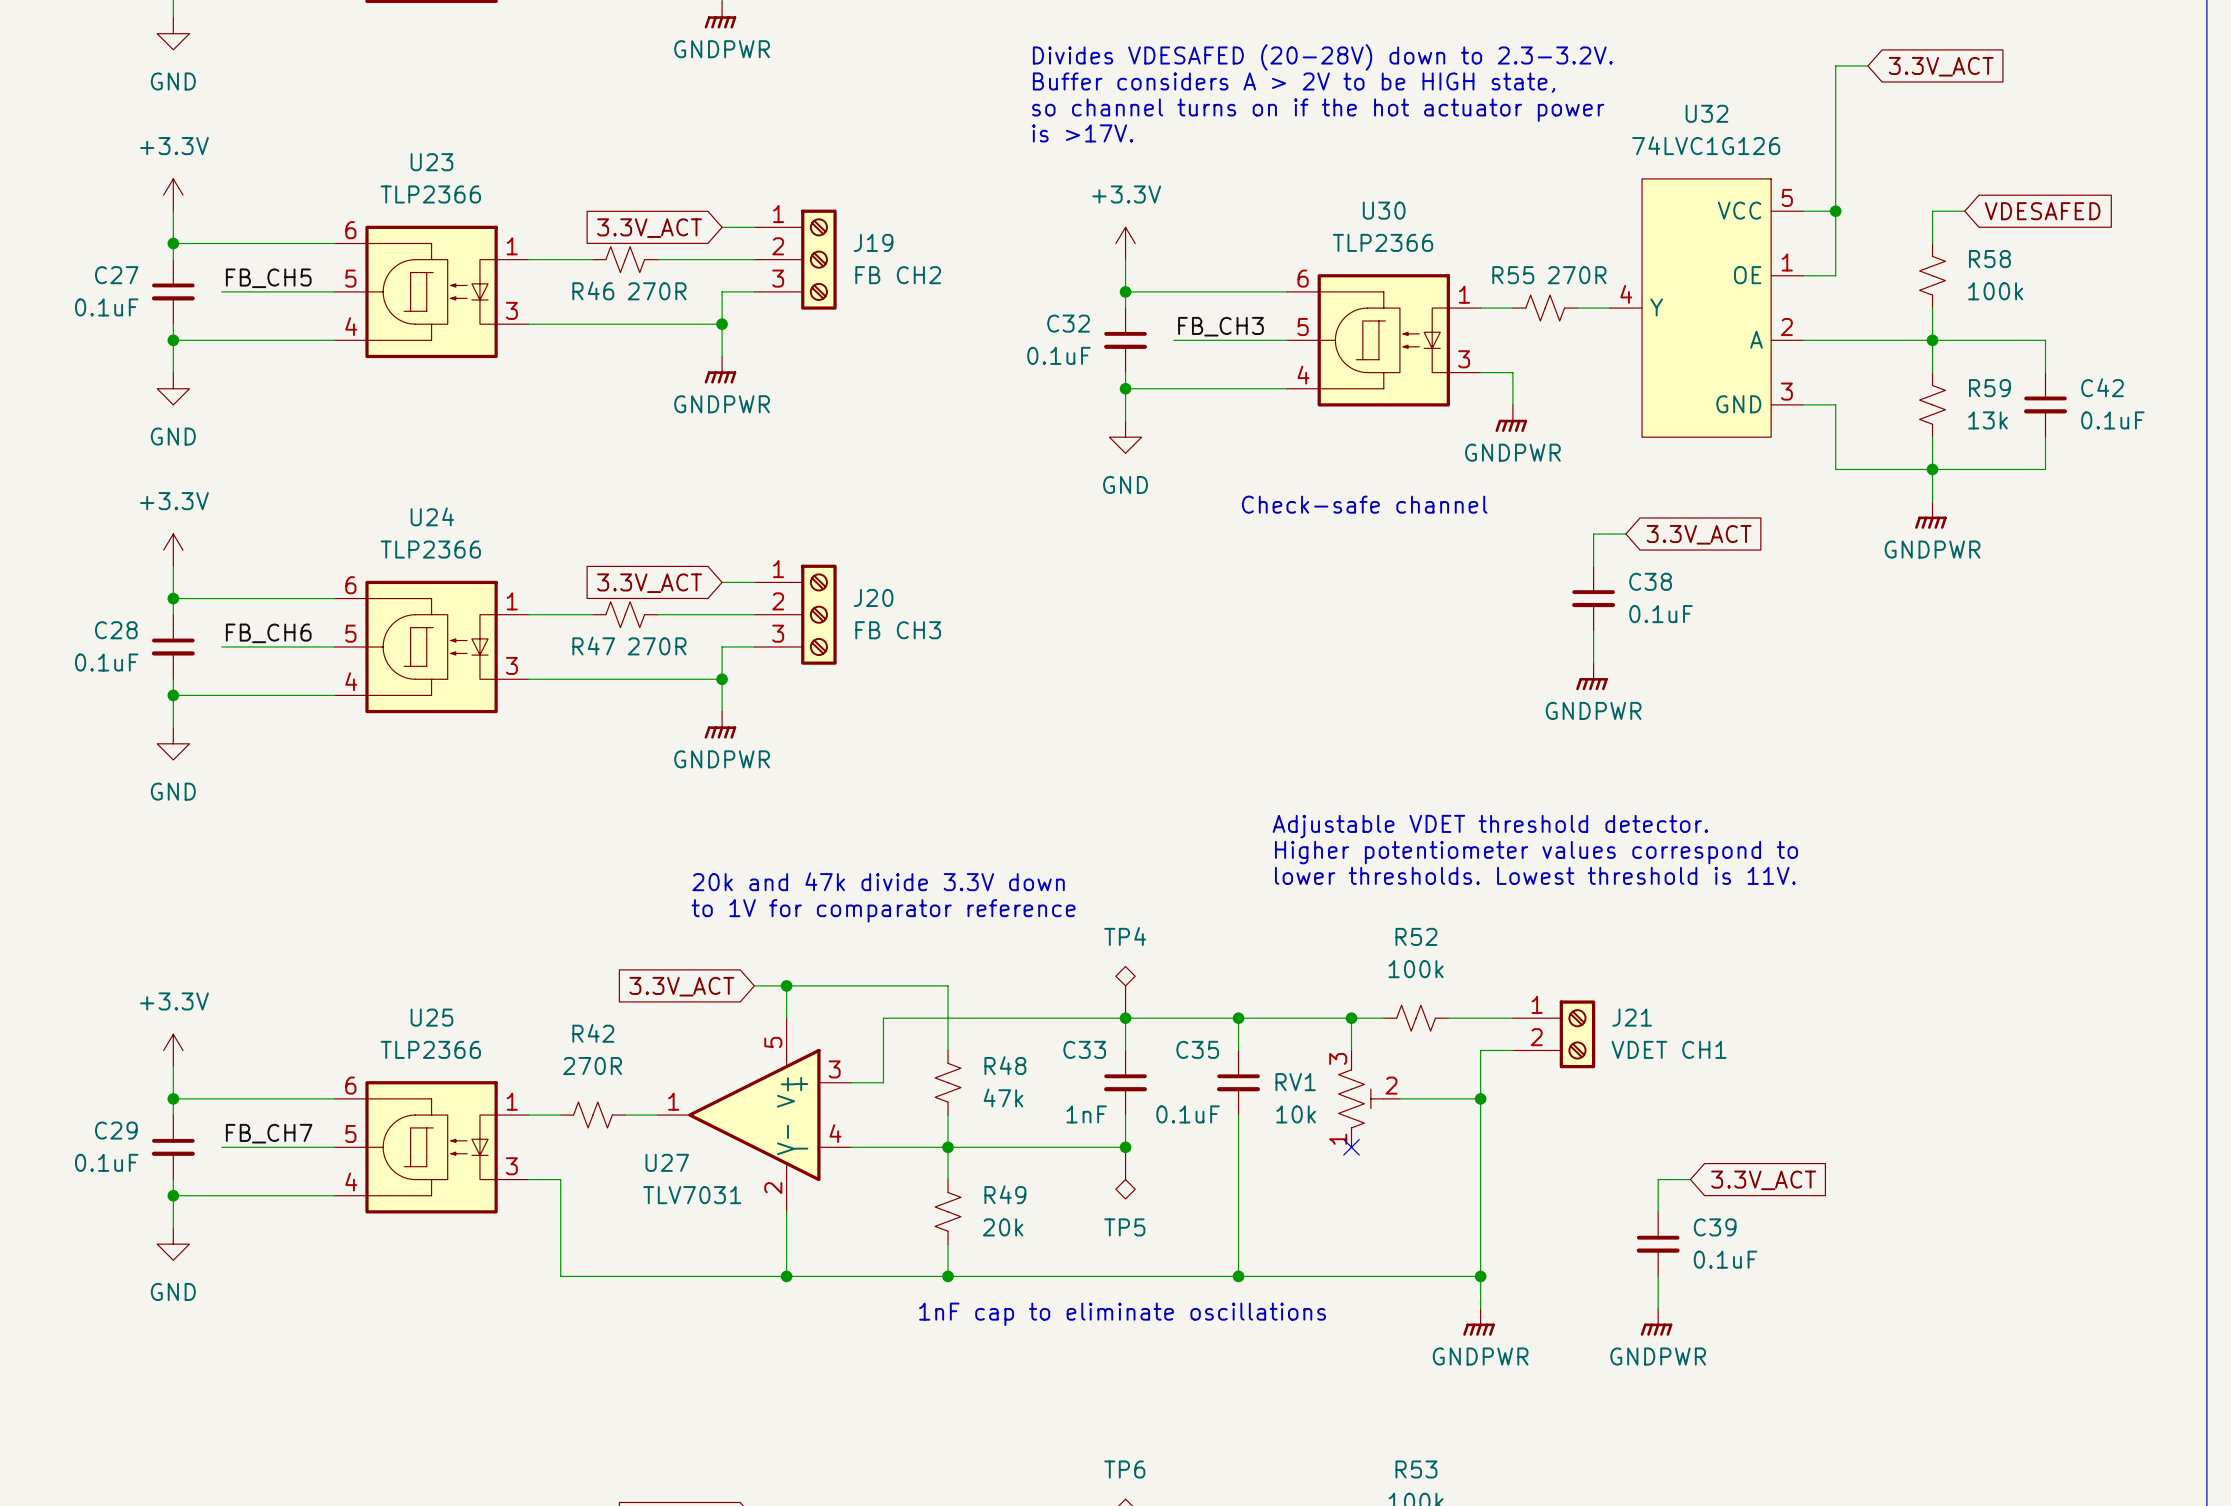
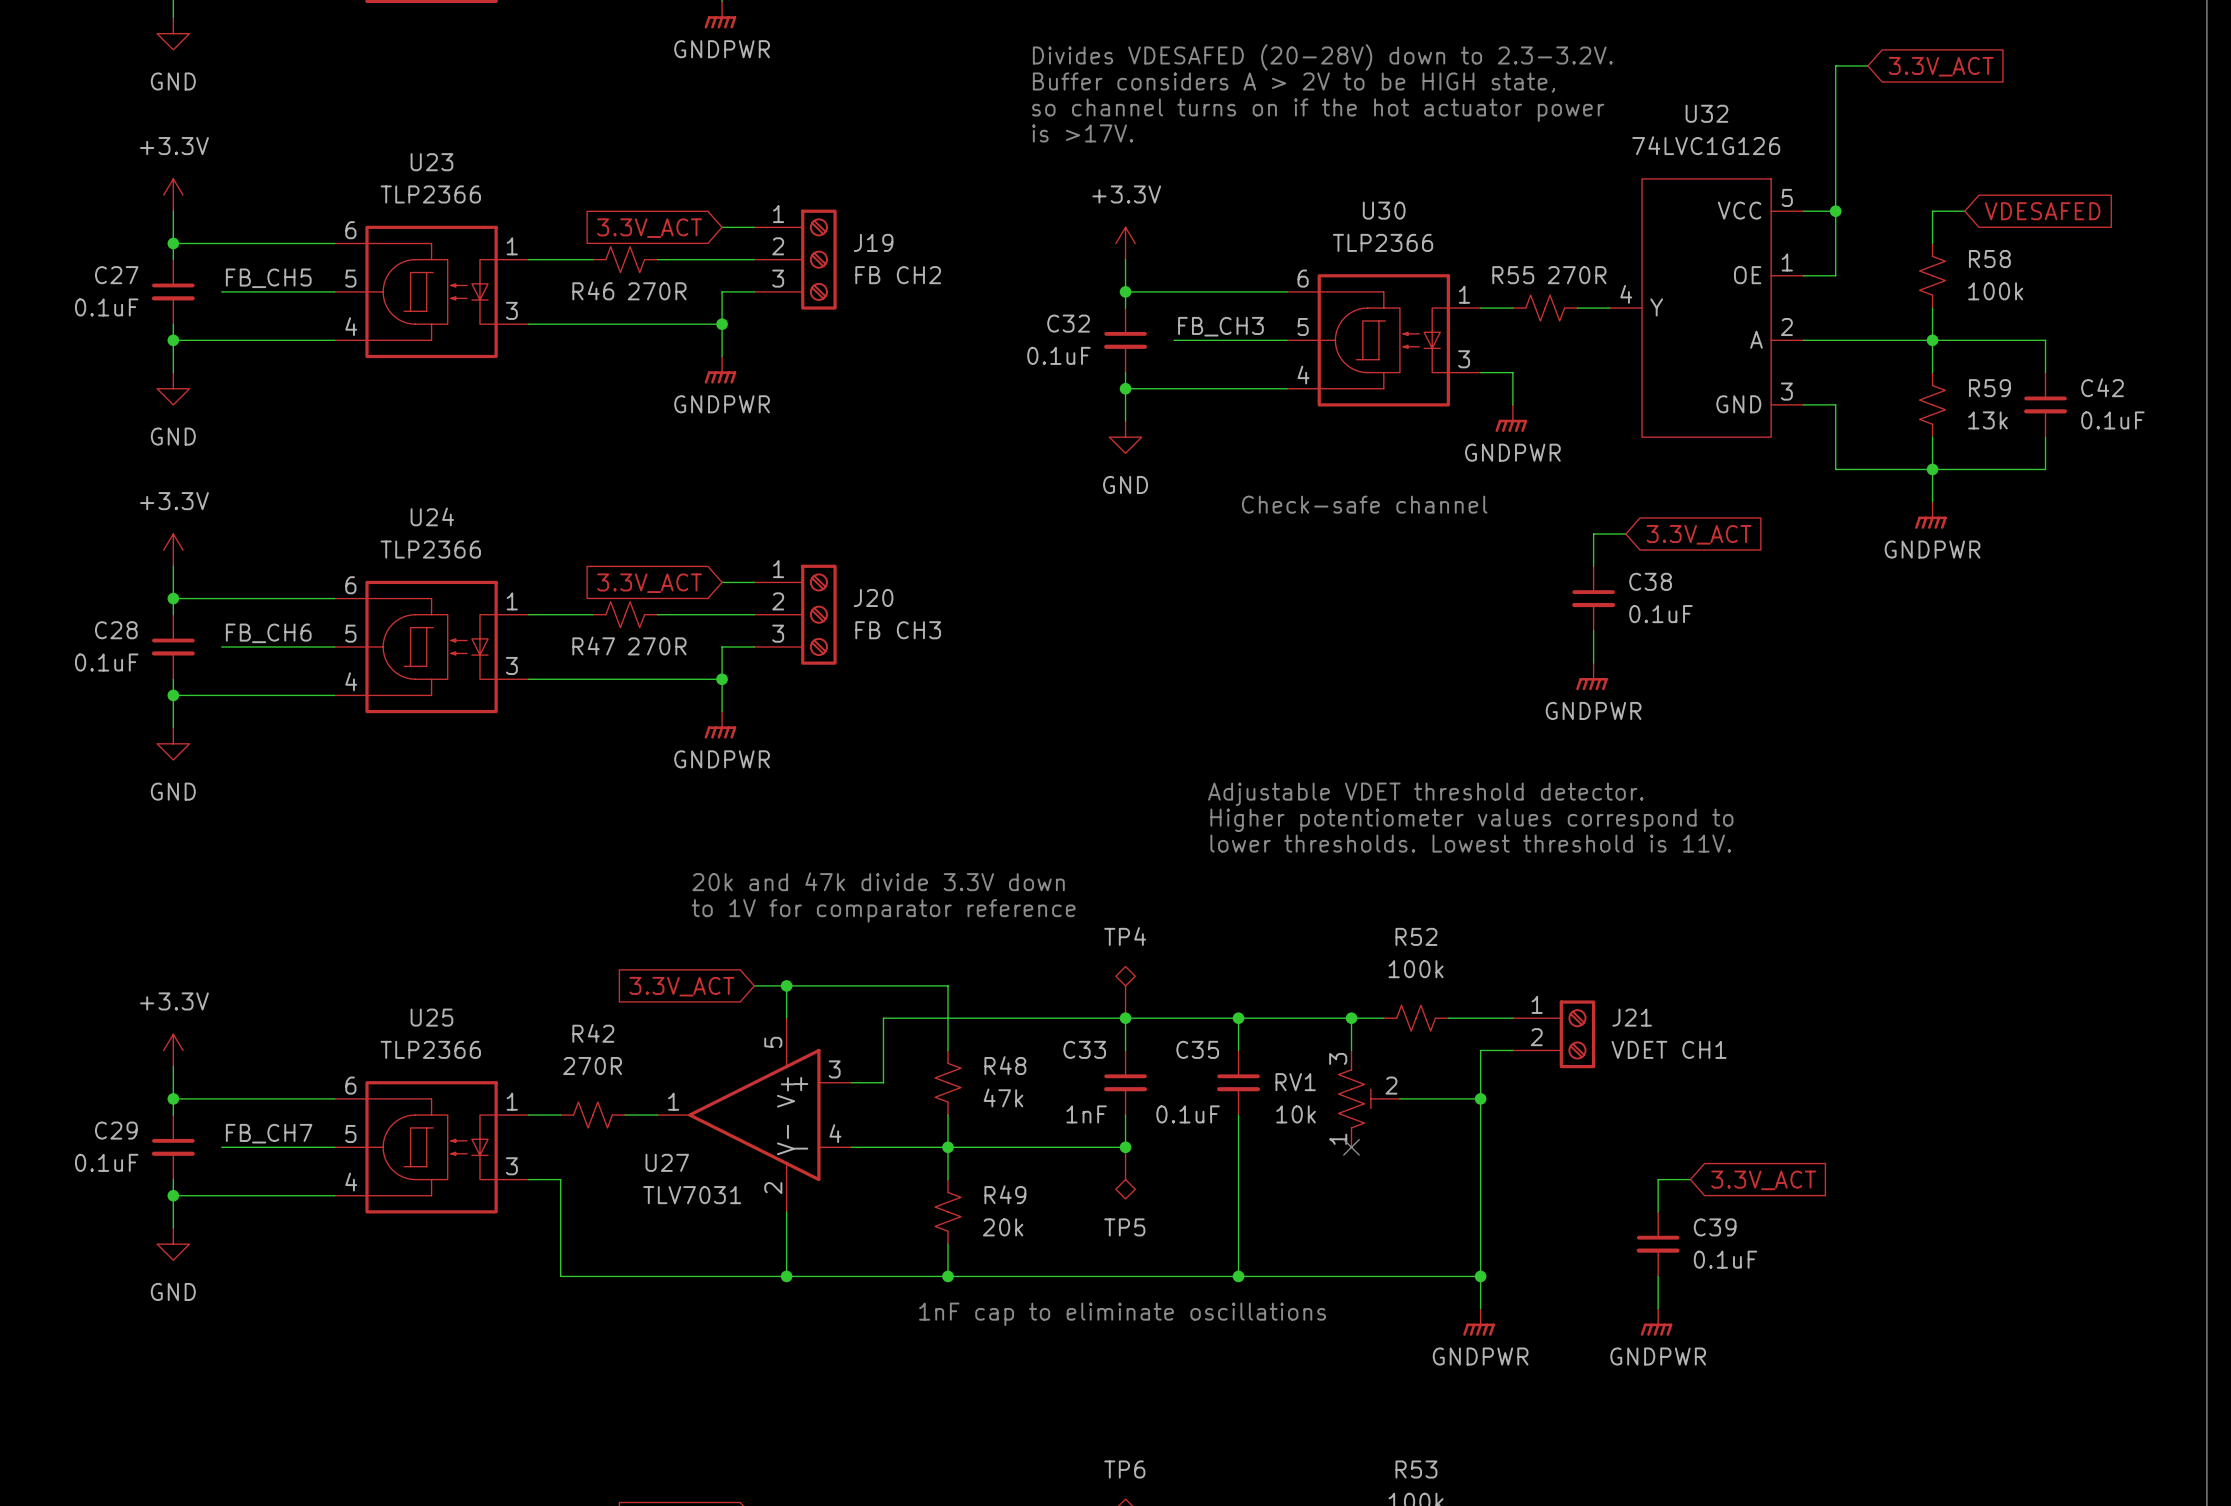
text position: Adjustable VDET threshold detector. (1490, 826) -> Adjustable VDET threshold detector. (1425, 794)
text position: Higher potentiometer values correspond to (1536, 852) -> Higher potentiometer values correspond to (1471, 820)
text position: lower thresholds. Lowest threshold is 11V. (1535, 875) -> lower thresholds. Lowest threshold is 11V. (1470, 843)

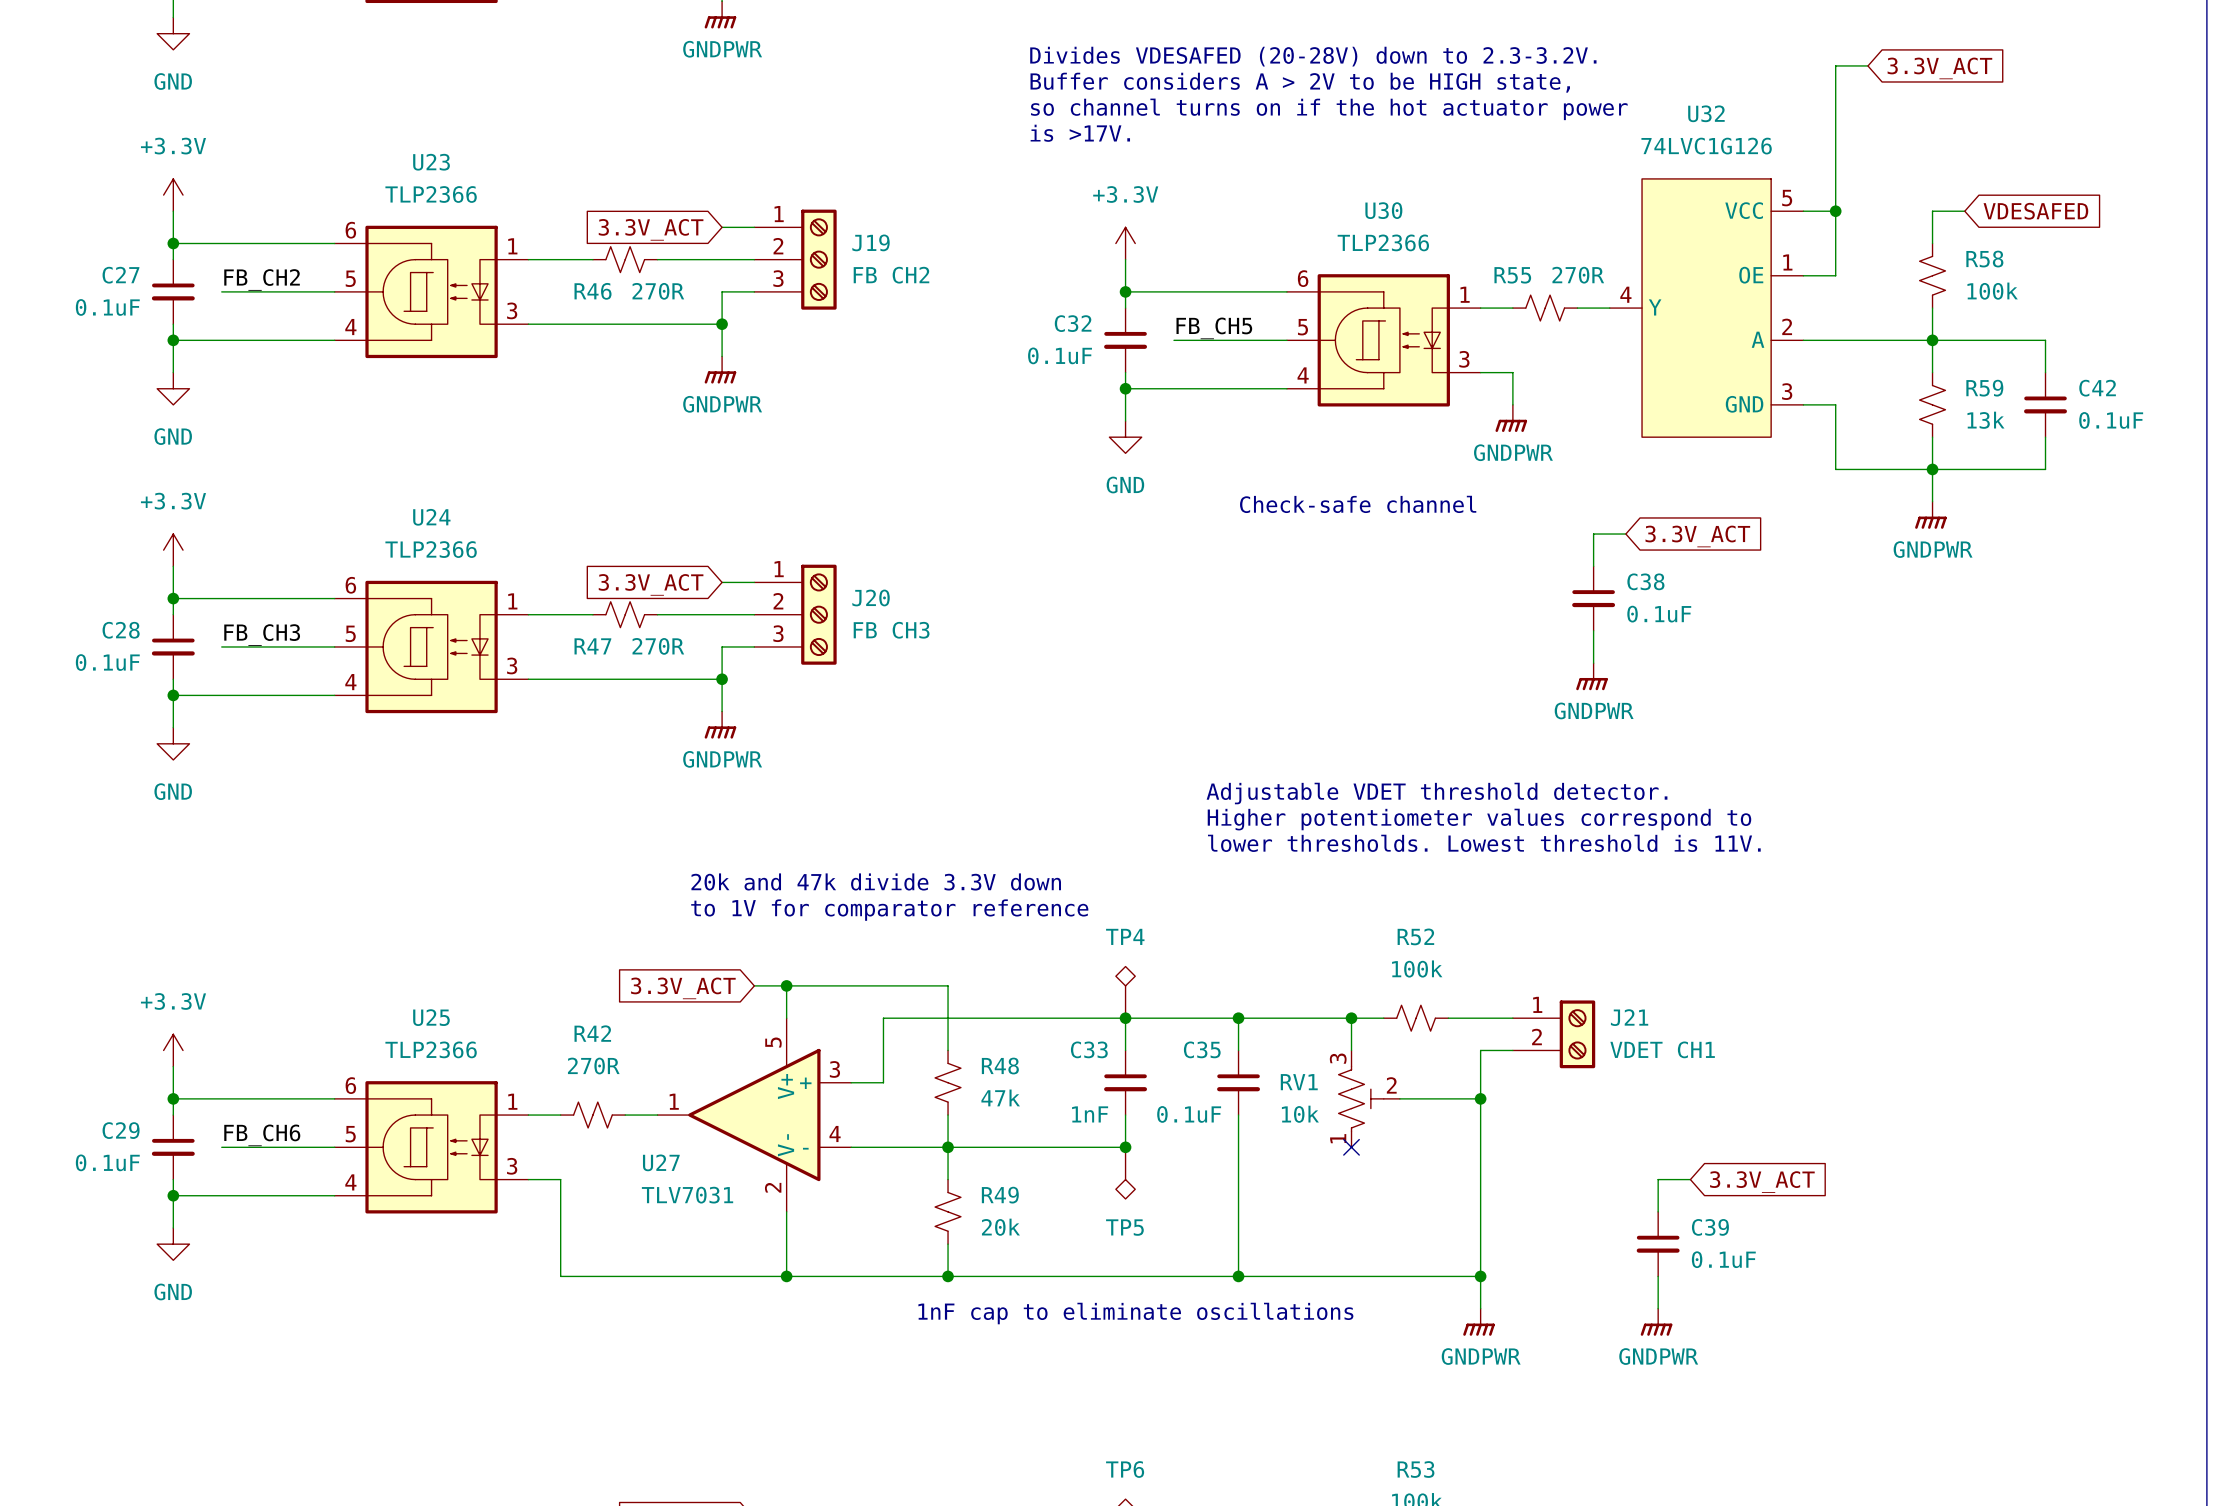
R58 flip: as is (1932, 275) -> left-right (1932, 275)
label: FB_CH5 (268, 278) -> FB_CH2 (262, 279)
label: FB_CH3 (1220, 326) -> FB_CH5 (1214, 328)
label: FB_CH6 (268, 633) -> FB_CH3 (262, 635)
label: FB_CH7 (269, 1133) -> FB_CH6 (262, 1135)

